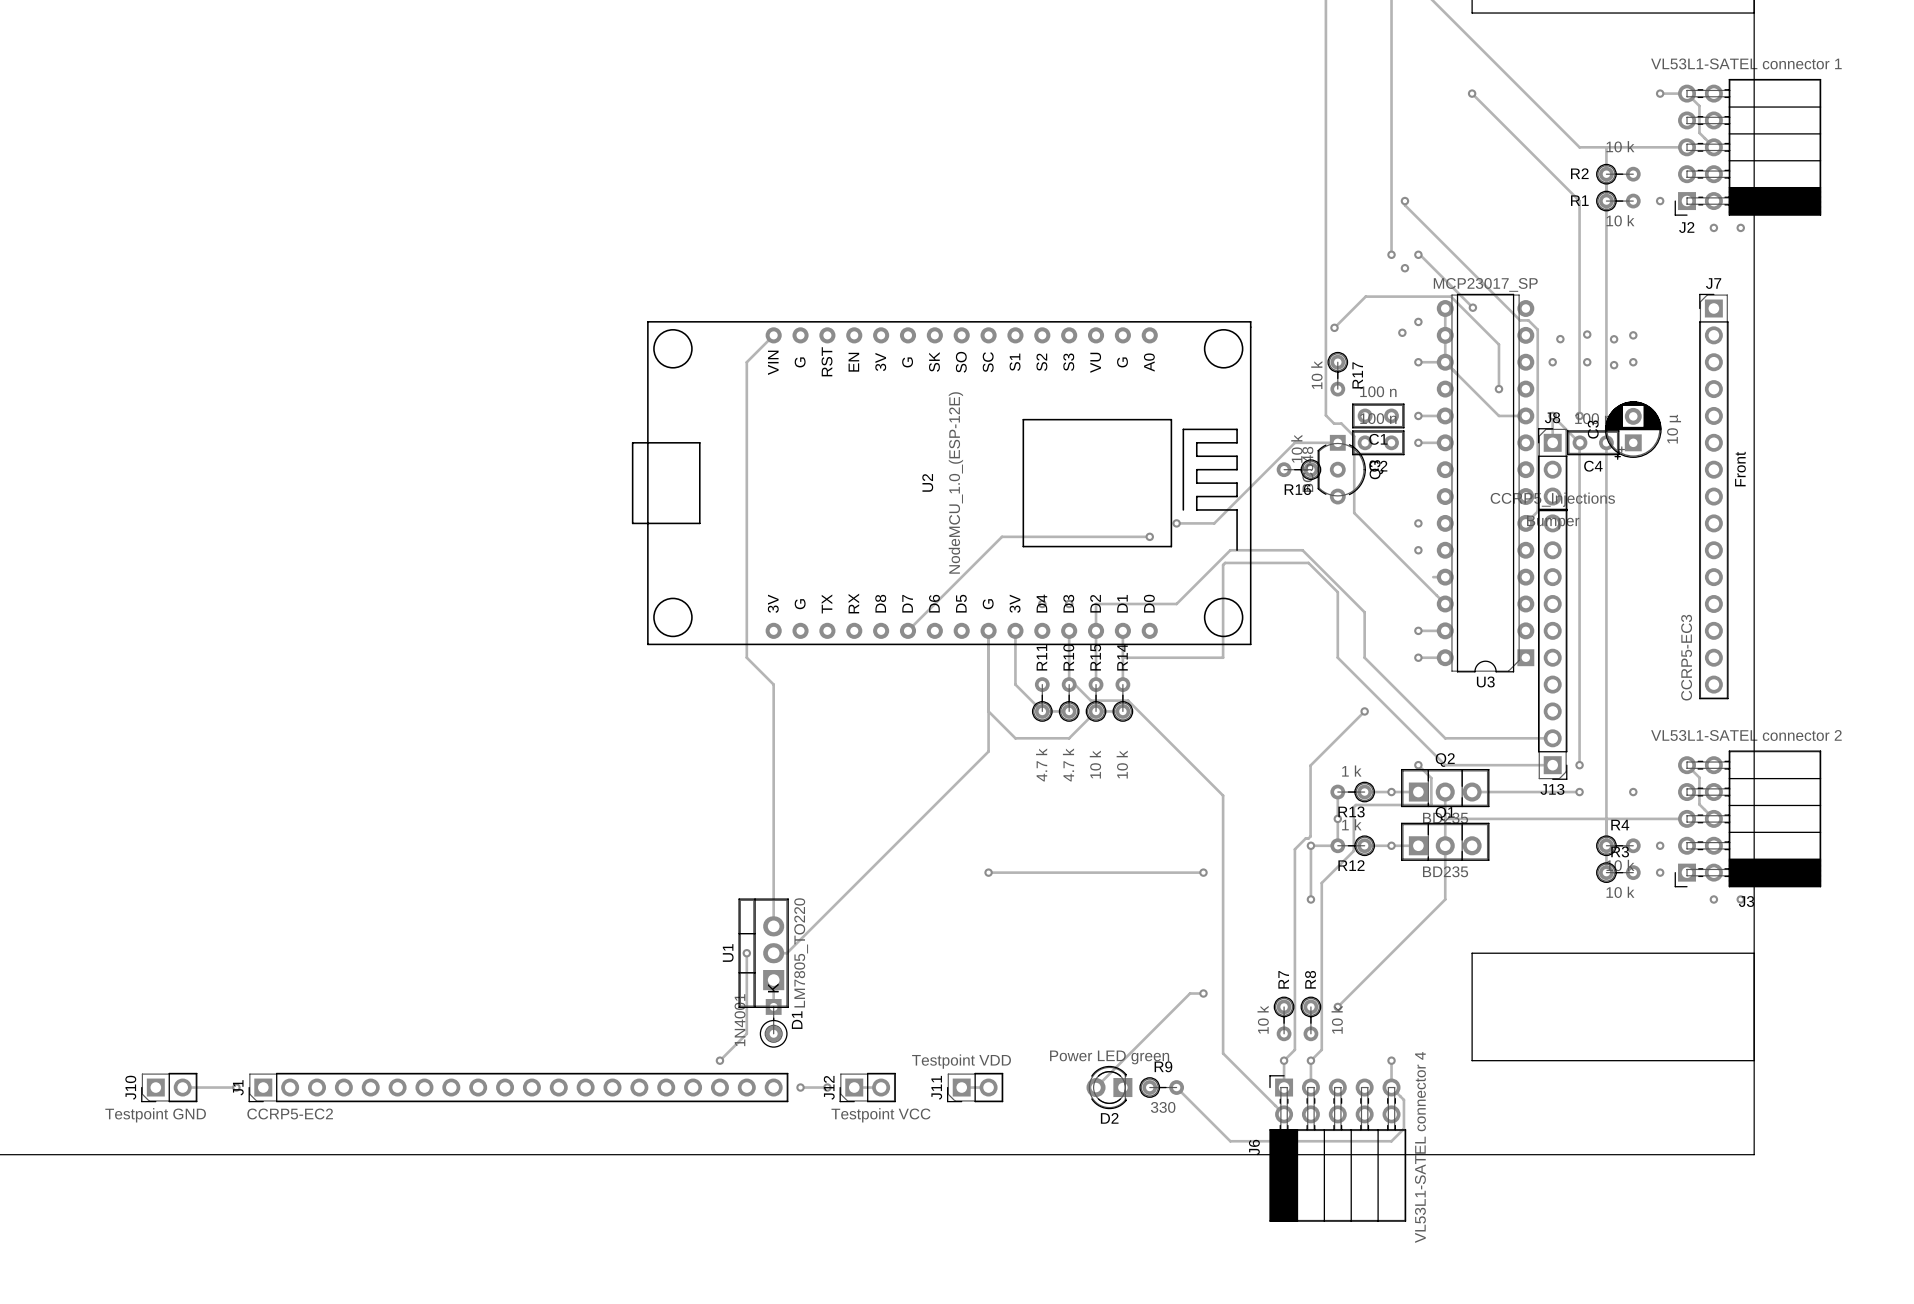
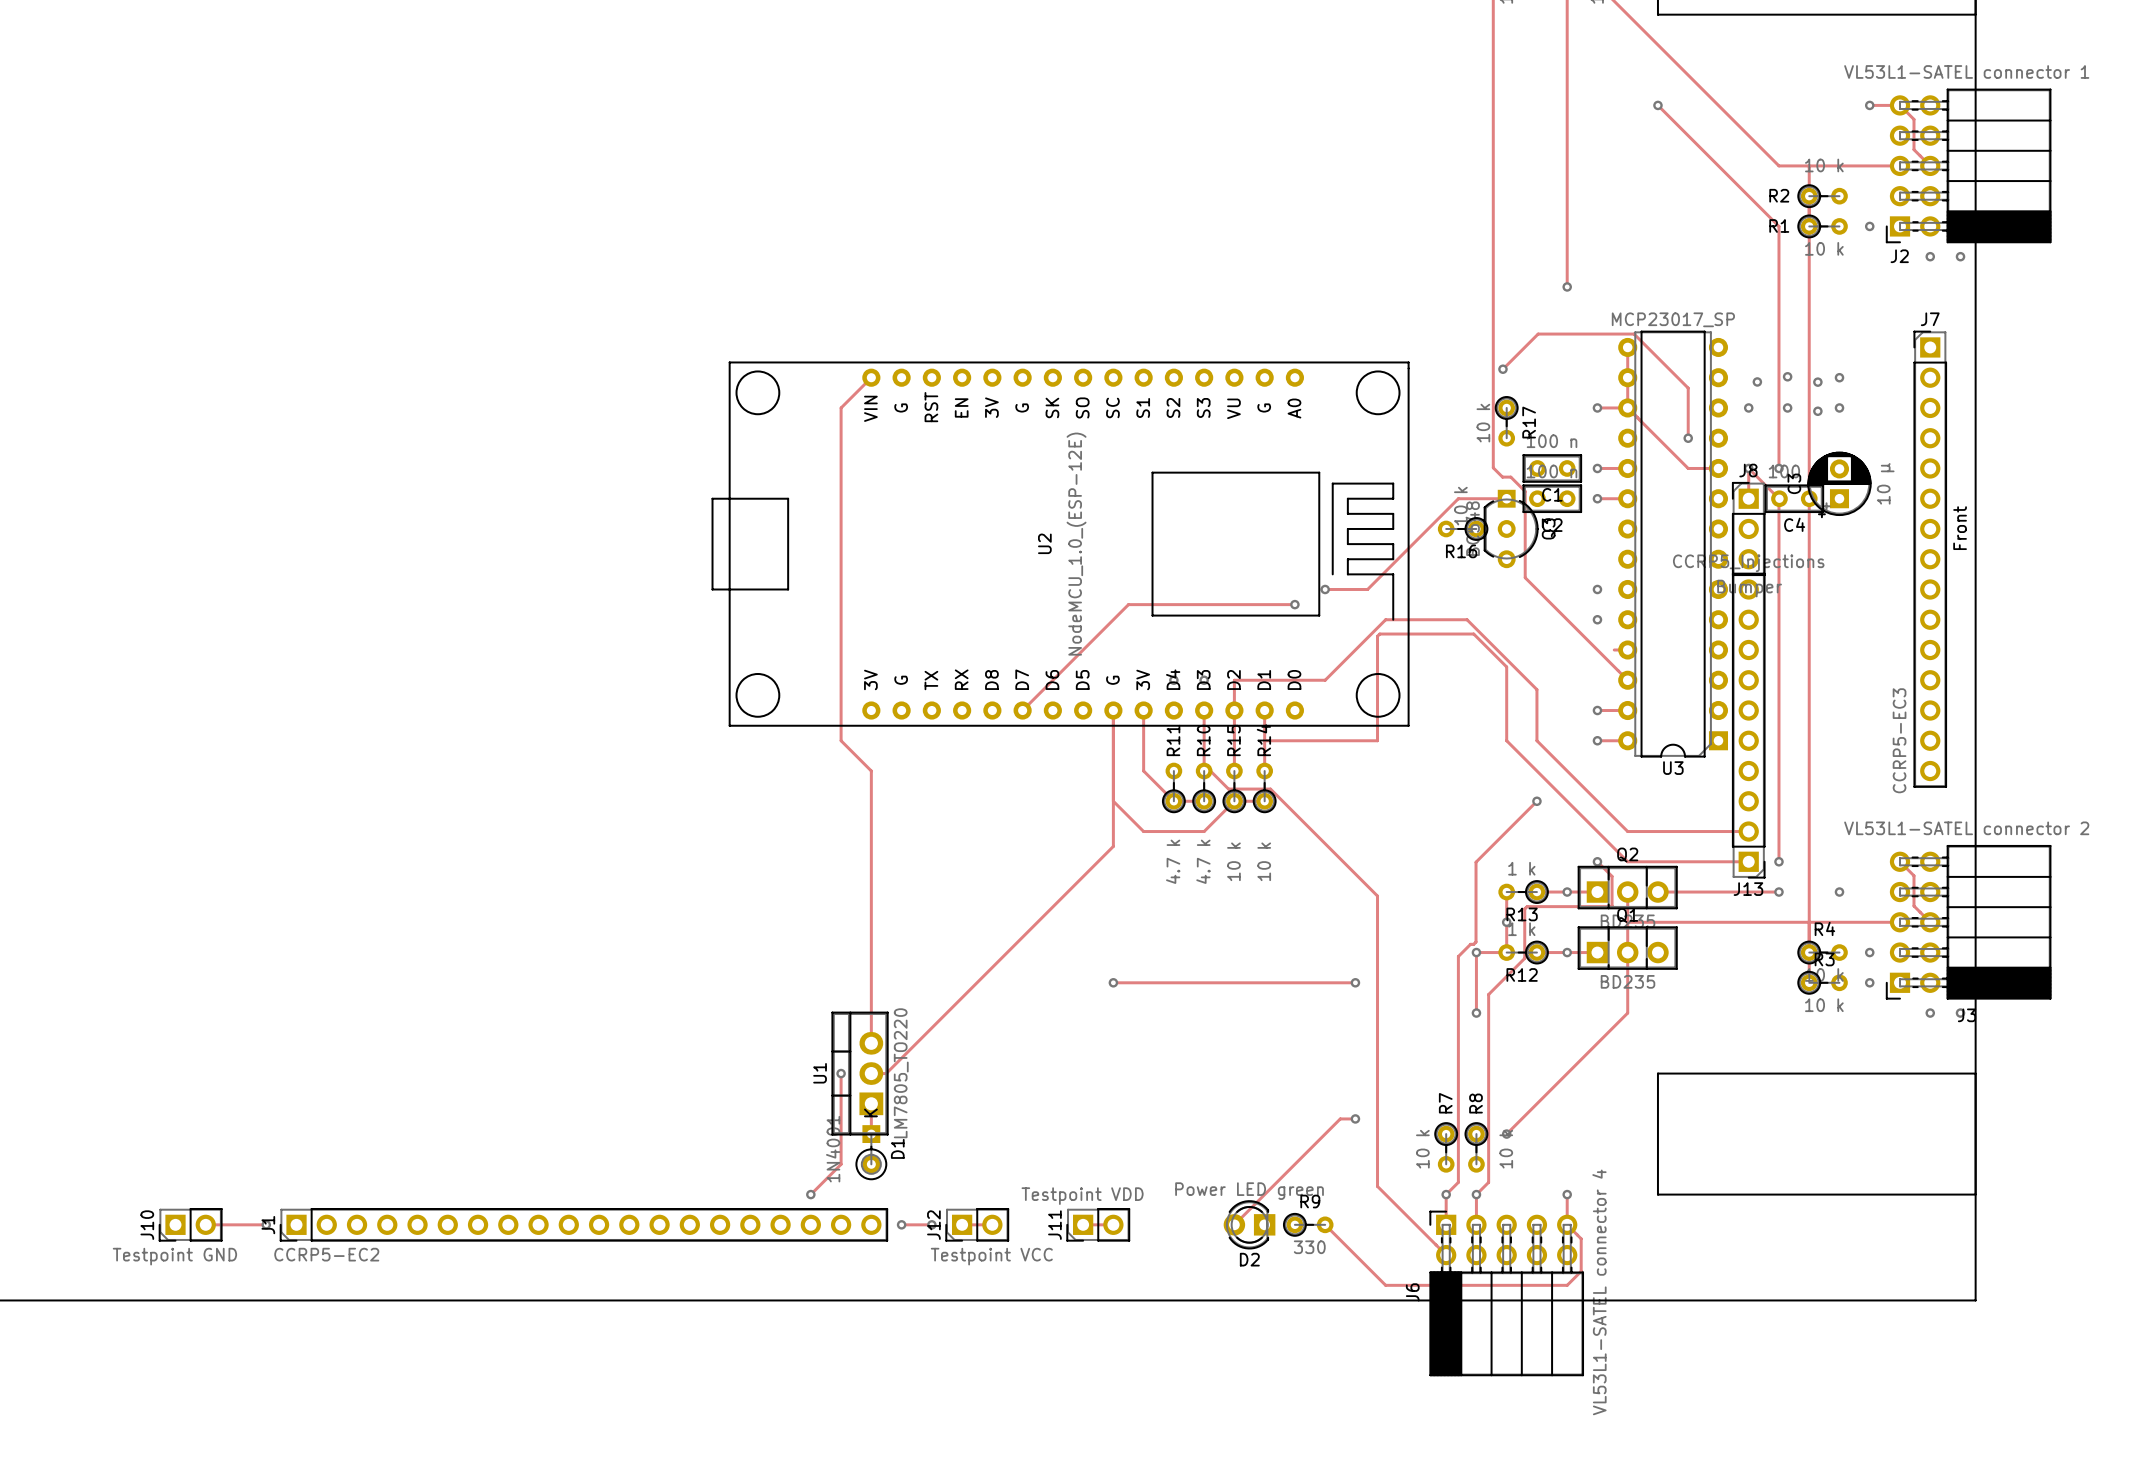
track: (1404, 201) (1404, 205) (1520, 320) (1528, 320) (1537, 329) (1537, 511) (1525, 523) -> none
via: (1404, 201) -> none
track: (1418, 254) (1472, 307) -> none
via: (1418, 254) -> none
via: (1404, 268) -> none
via: (1472, 307) -> none
via: (1418, 321) -> none
via: (1402, 332) -> none

